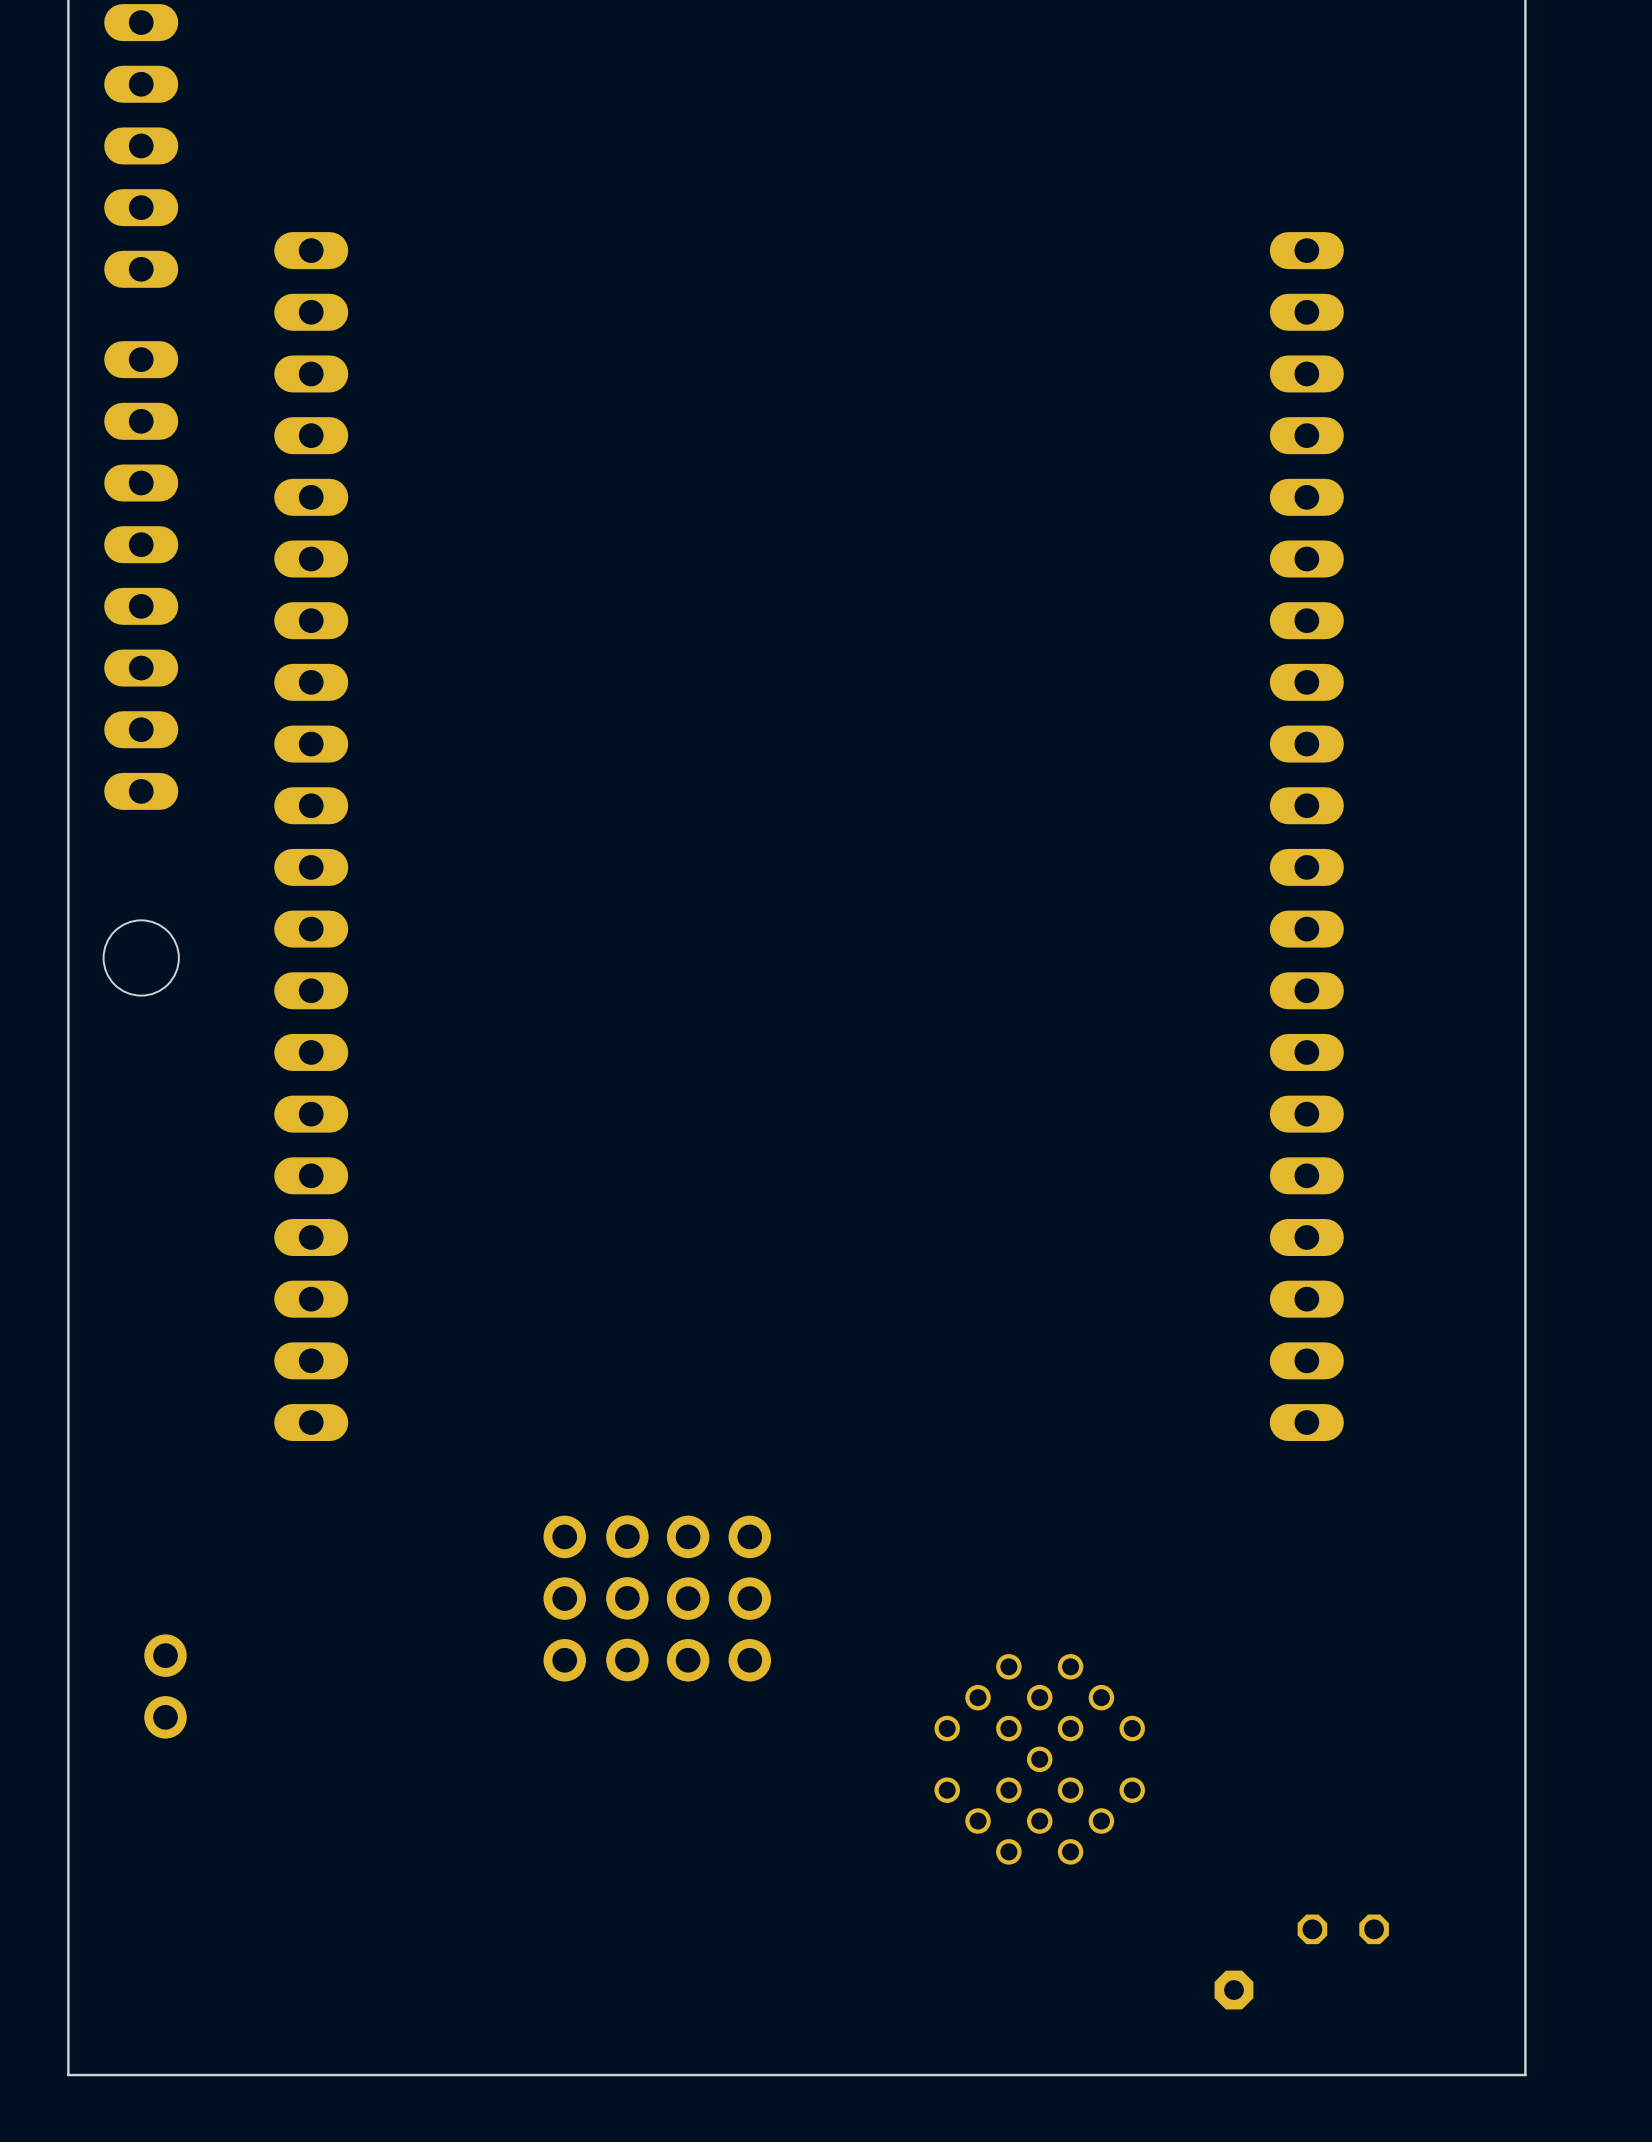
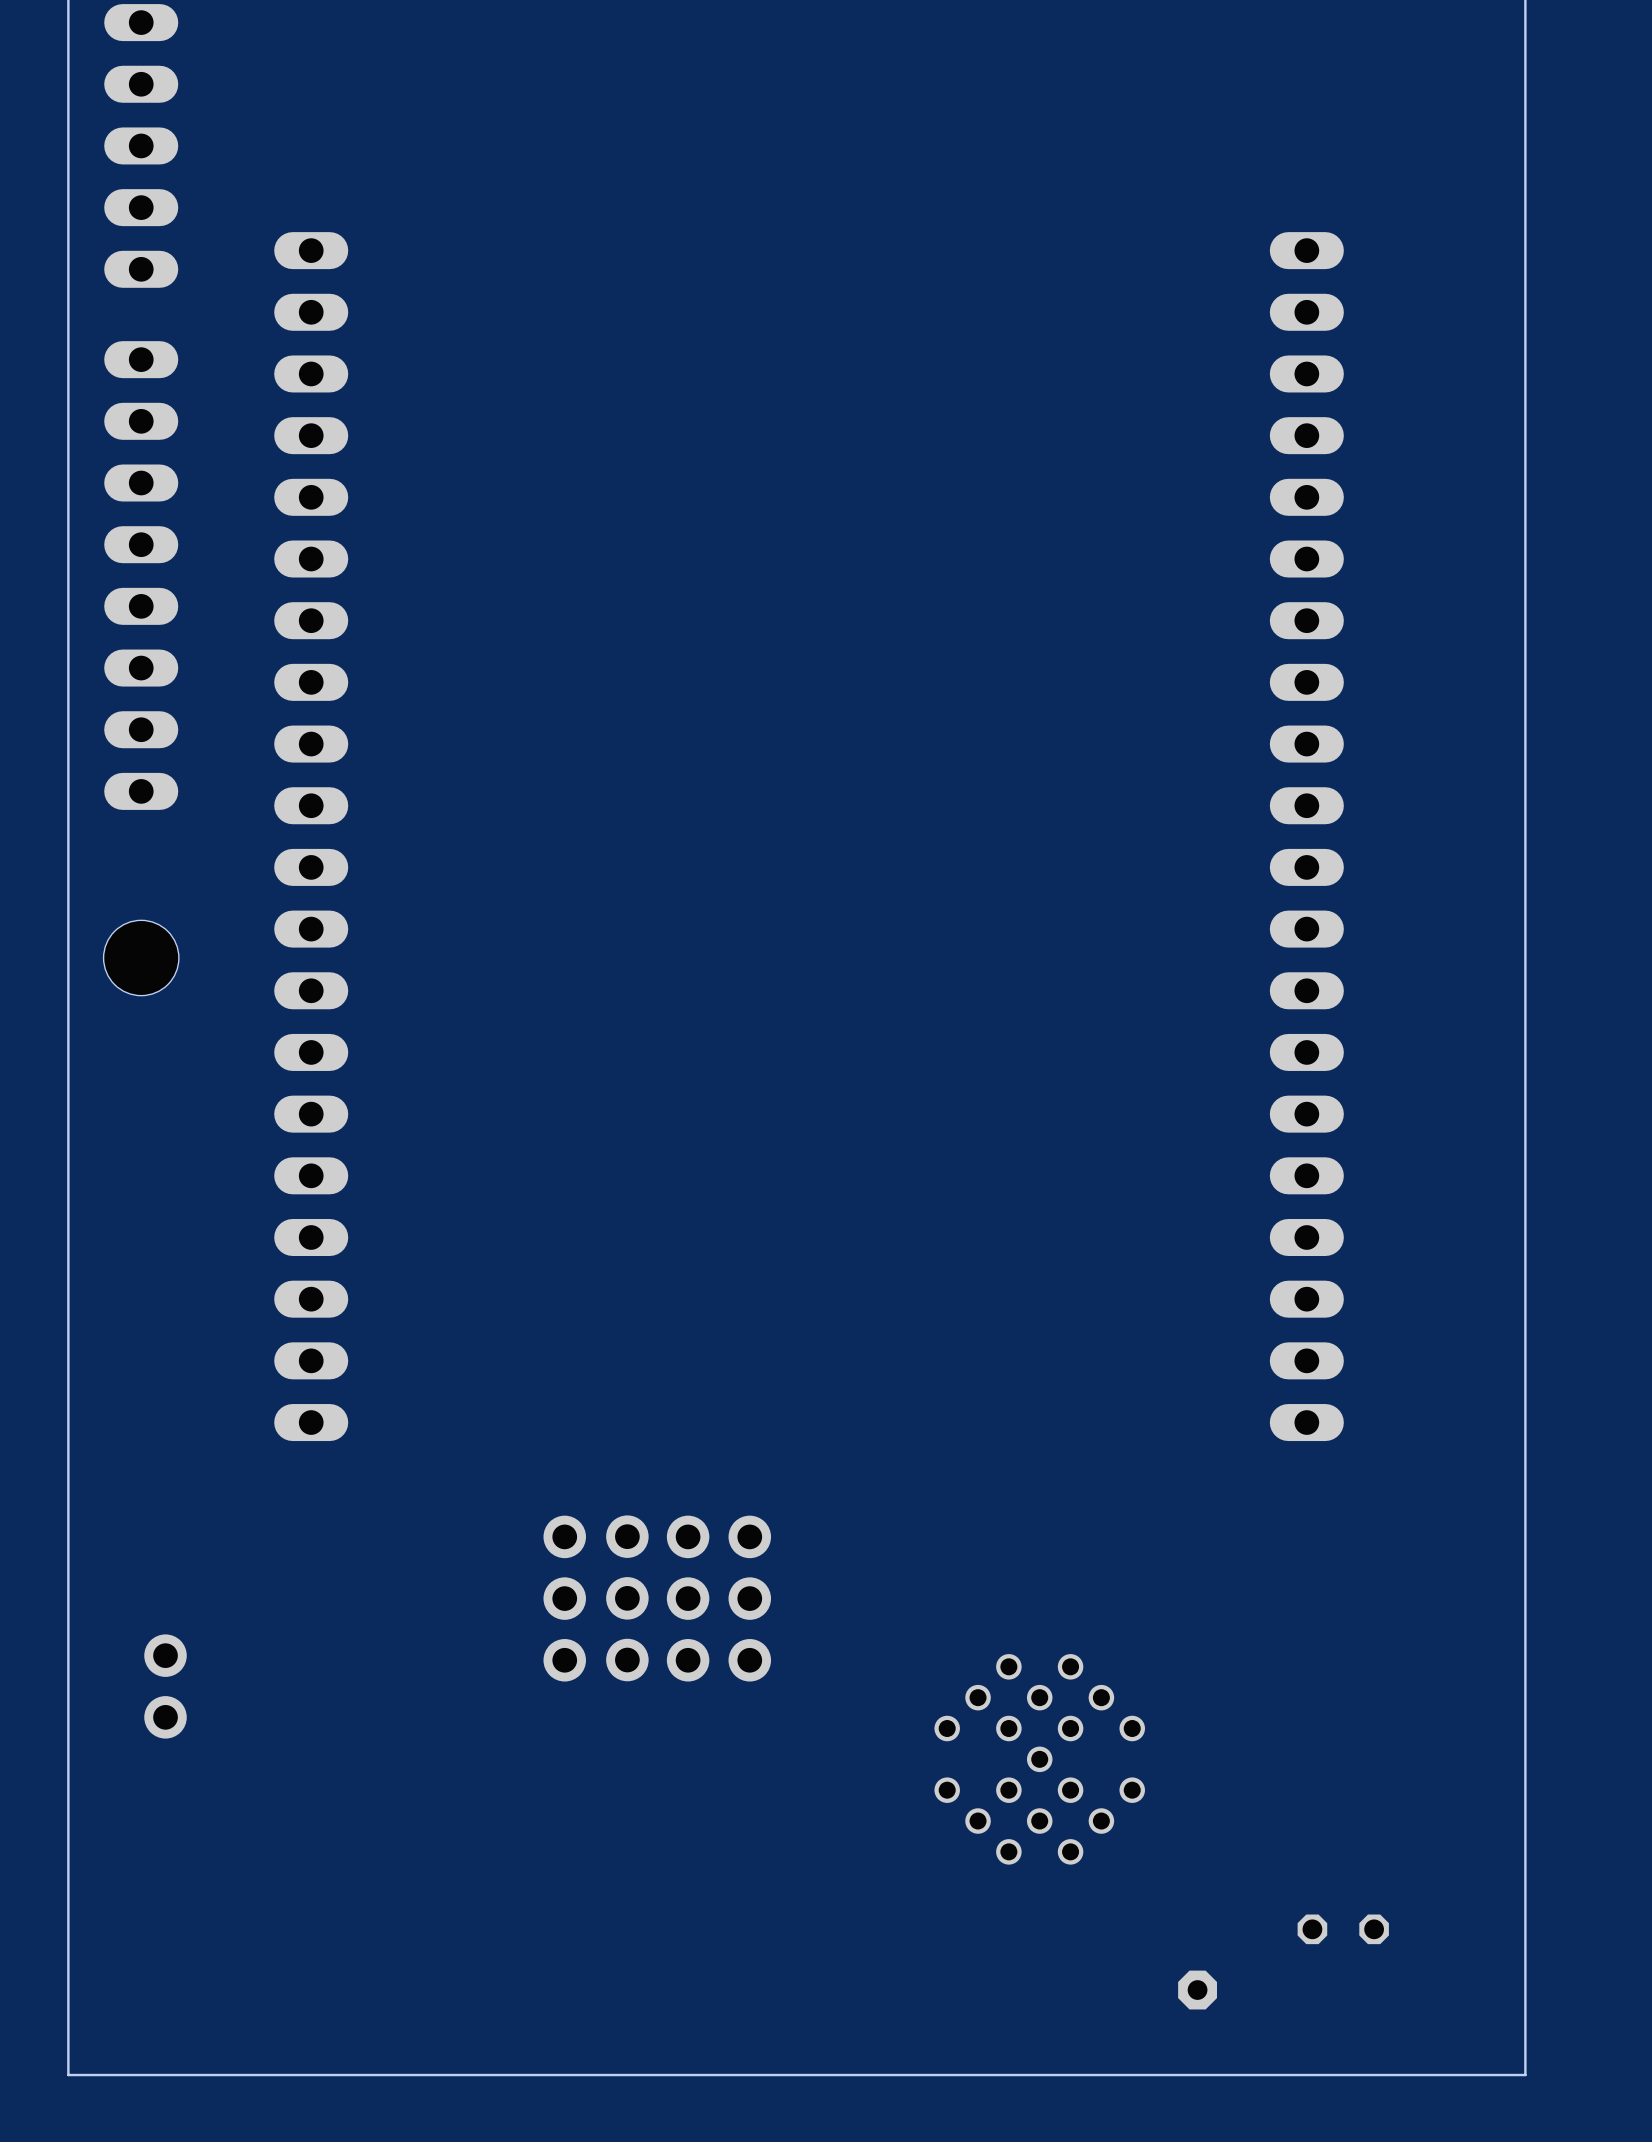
part position: (1233, 1990) -> (1197, 1990)

